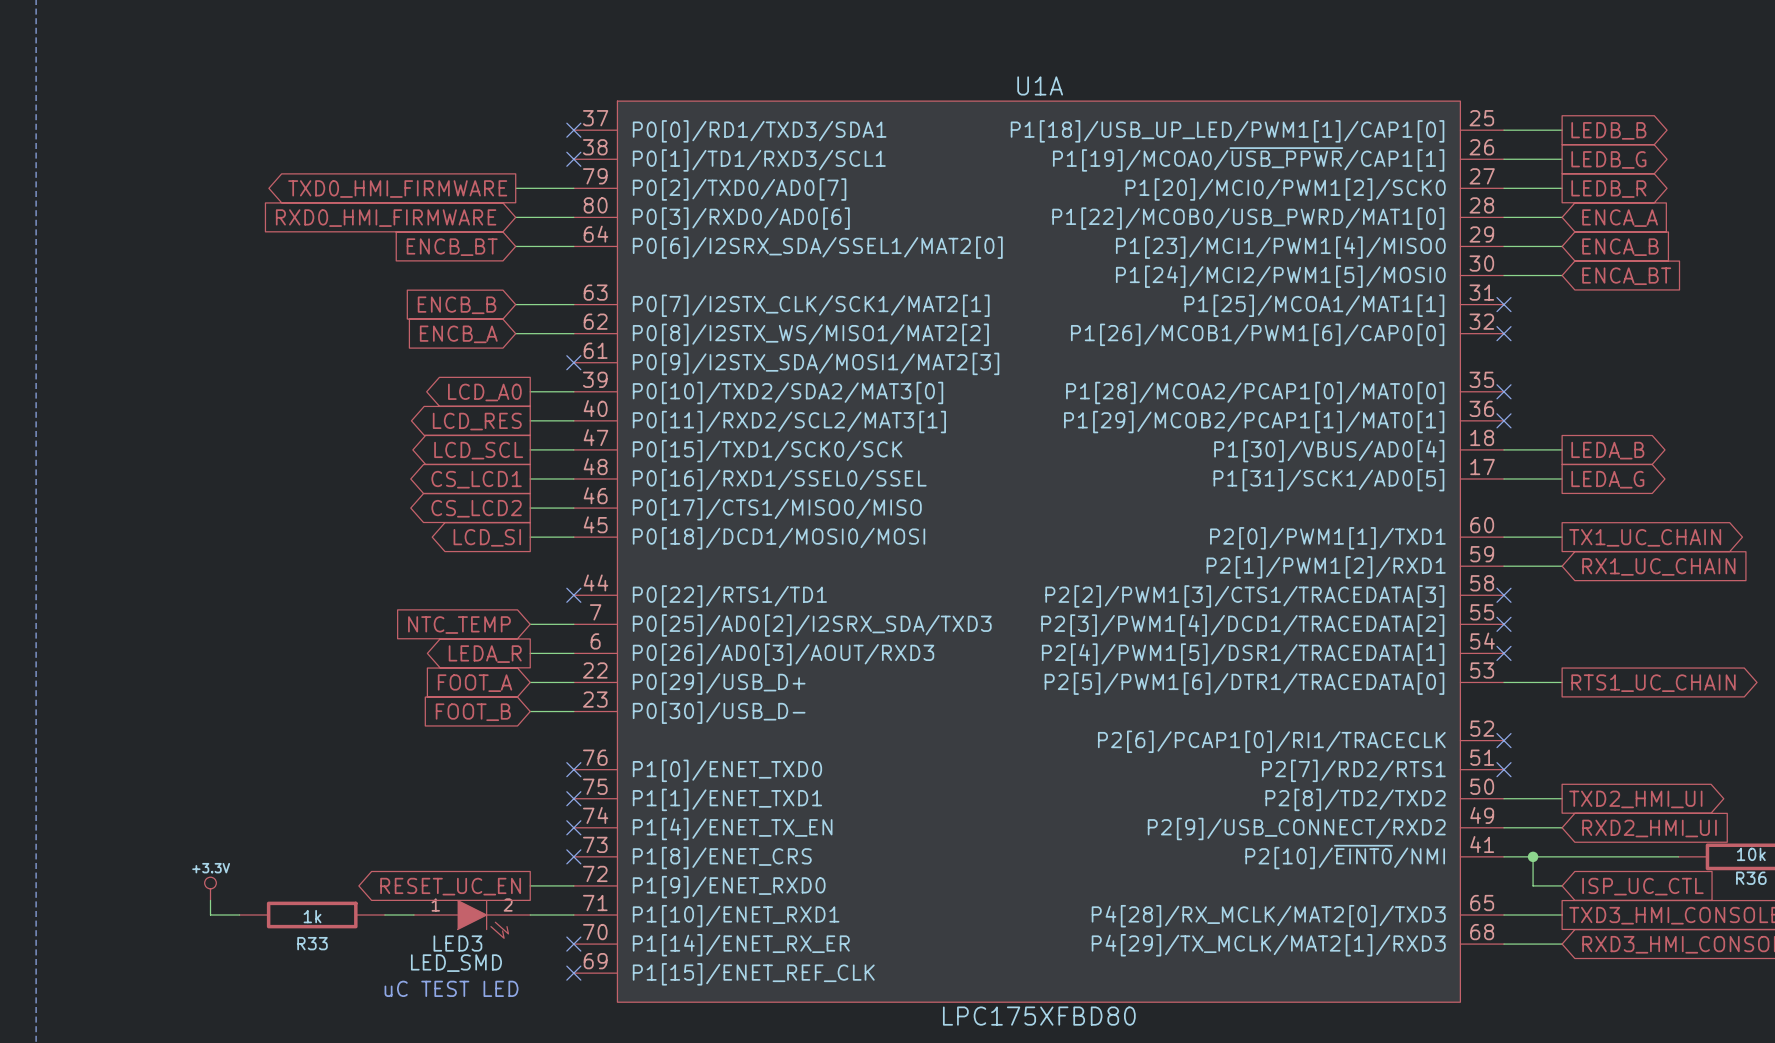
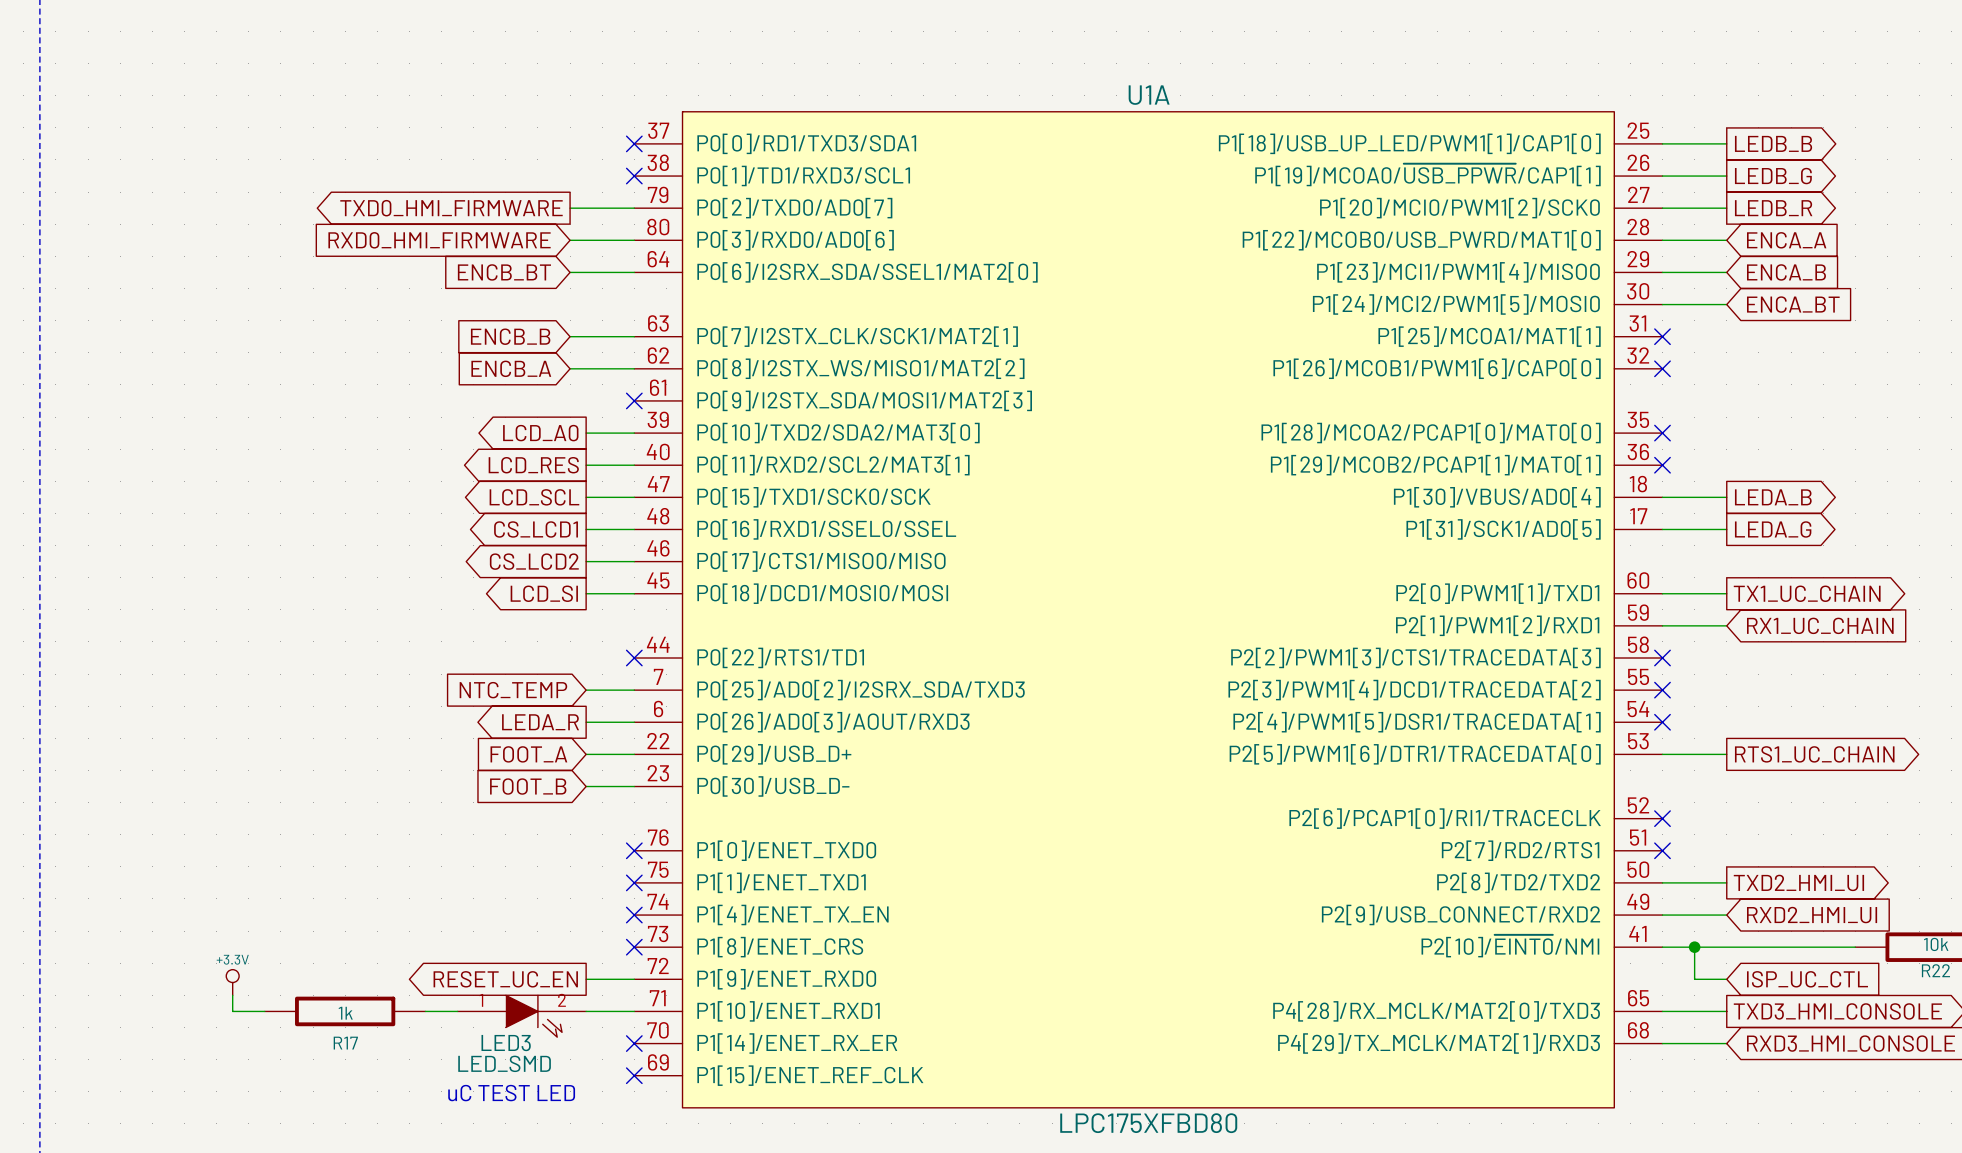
R36 name: R36 (1751, 878) -> R22 (1935, 970)
R33 name: R33 (312, 943) -> R17 (345, 1043)

